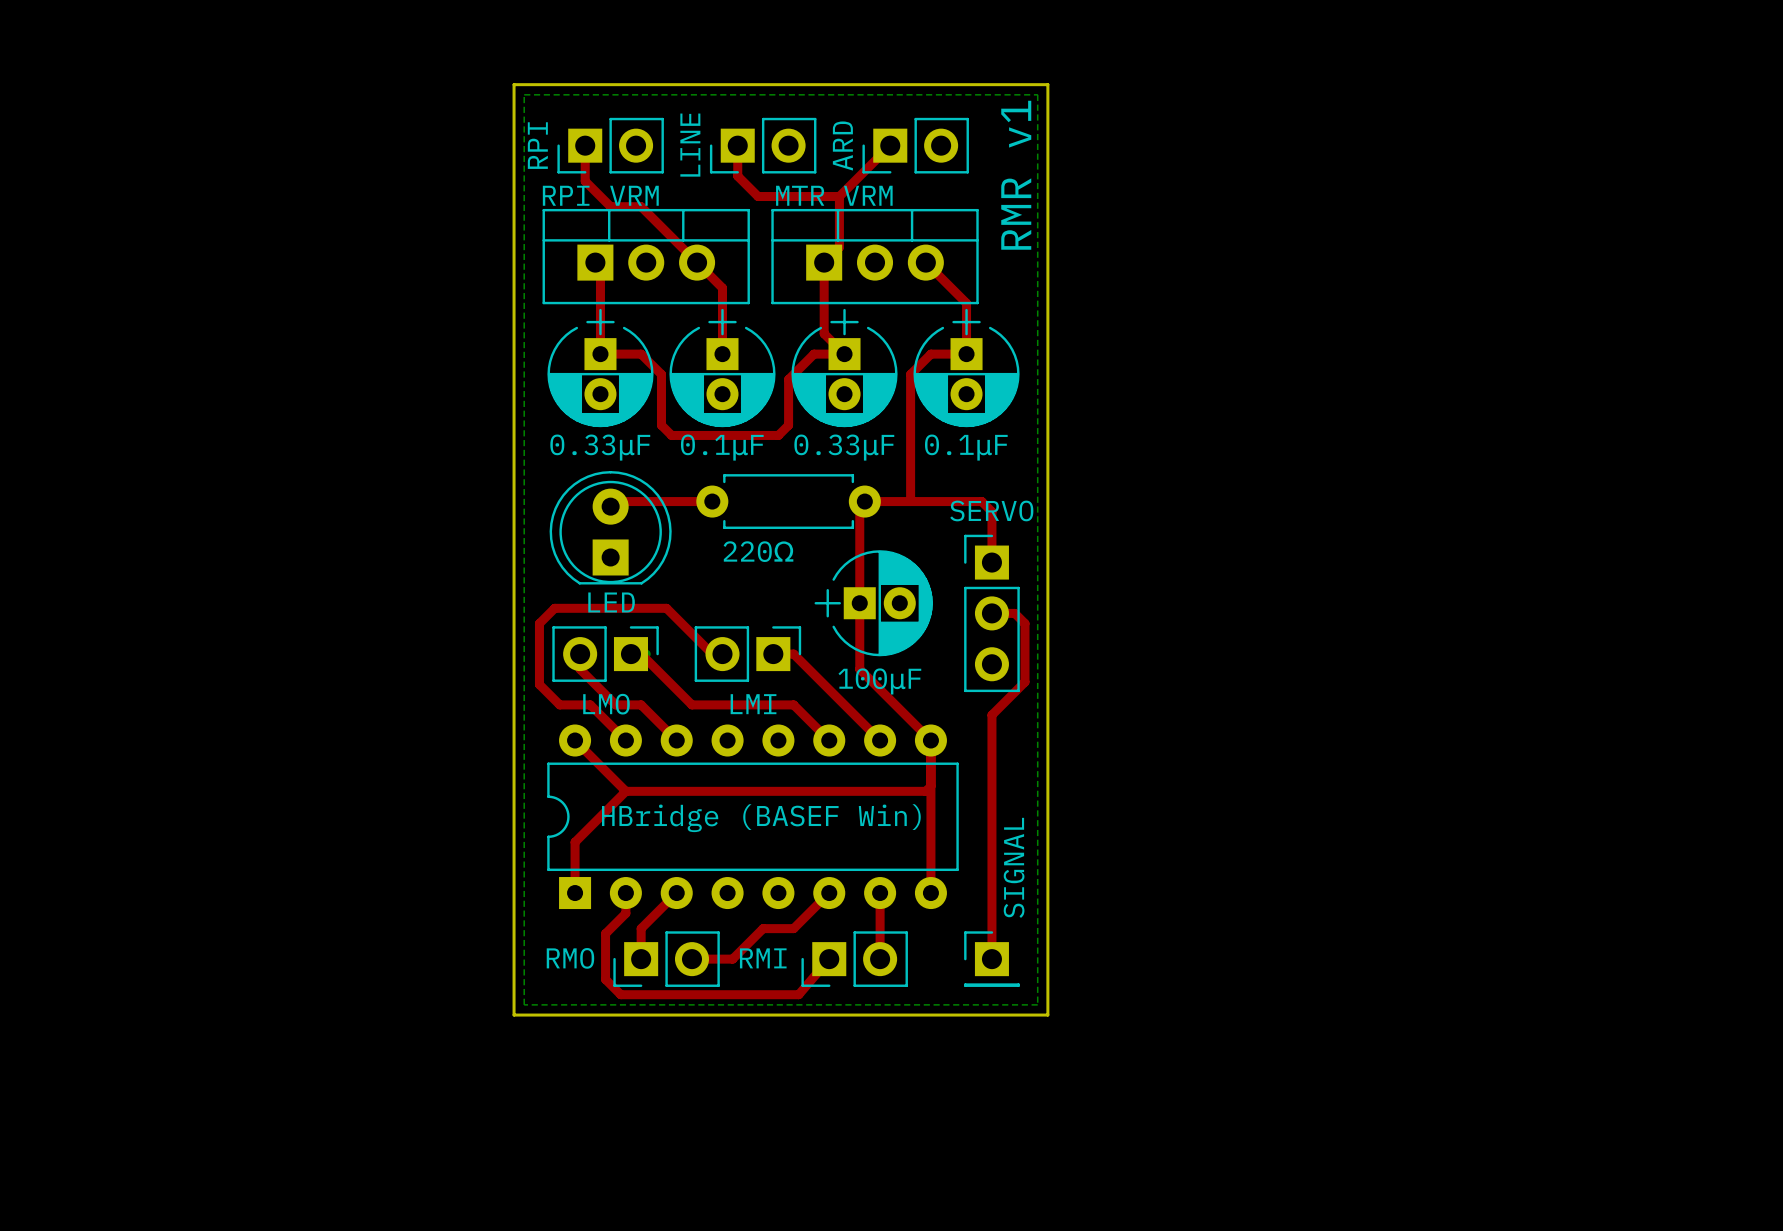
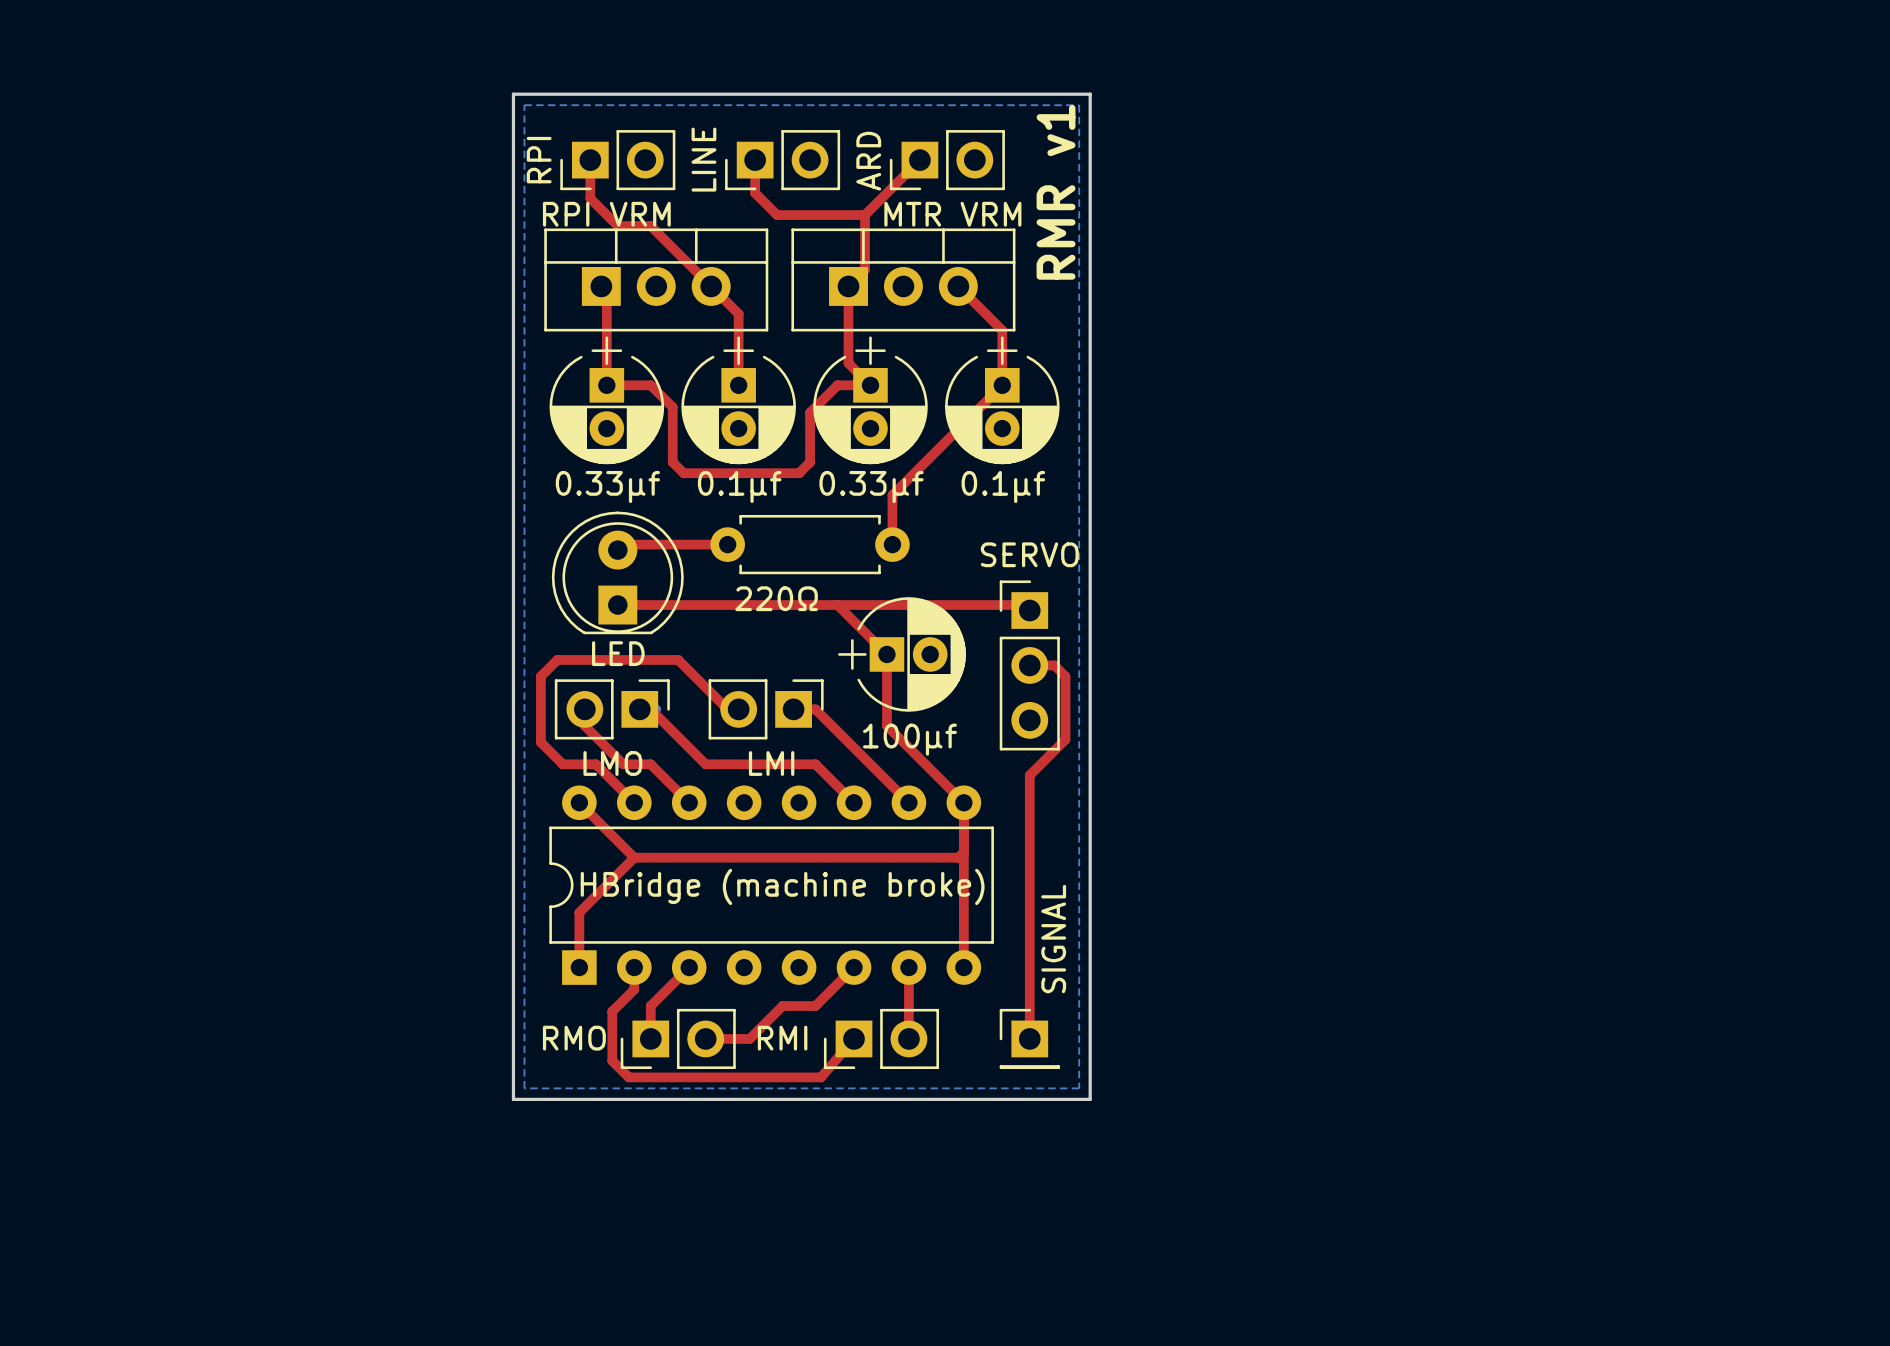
MTR VRM name position: MTR VRM (834, 195) -> MTR VRM (952, 214)
top track: (966, 354) (930, 354) (910, 374) (910, 501) -> (1002, 385) (892, 495) (892, 544)
0.33μF name: 0.33μF (600, 447) -> 0.33μf (607, 486)
0.1μF name: 0.1μF (722, 447) -> 0.1μf (739, 486)
0.33μF name: 0.33μF (844, 447) -> 0.33μf (871, 486)
0.1μF name: 0.1μF (966, 447) -> 0.1μf (1003, 486)
top track: none -> (617, 605) (1024, 605)
top track: (991, 562) (991, 511) (981, 501) (864, 501) (859, 506) (859, 603) -> (837, 605) (886, 654)
100μF name: 100μF (879, 681) -> 100μf (909, 739)
HBridge (BASEF Win) name: HBridge (BASEF Win) (761, 818) -> HBridge (machine broke) (782, 886)

